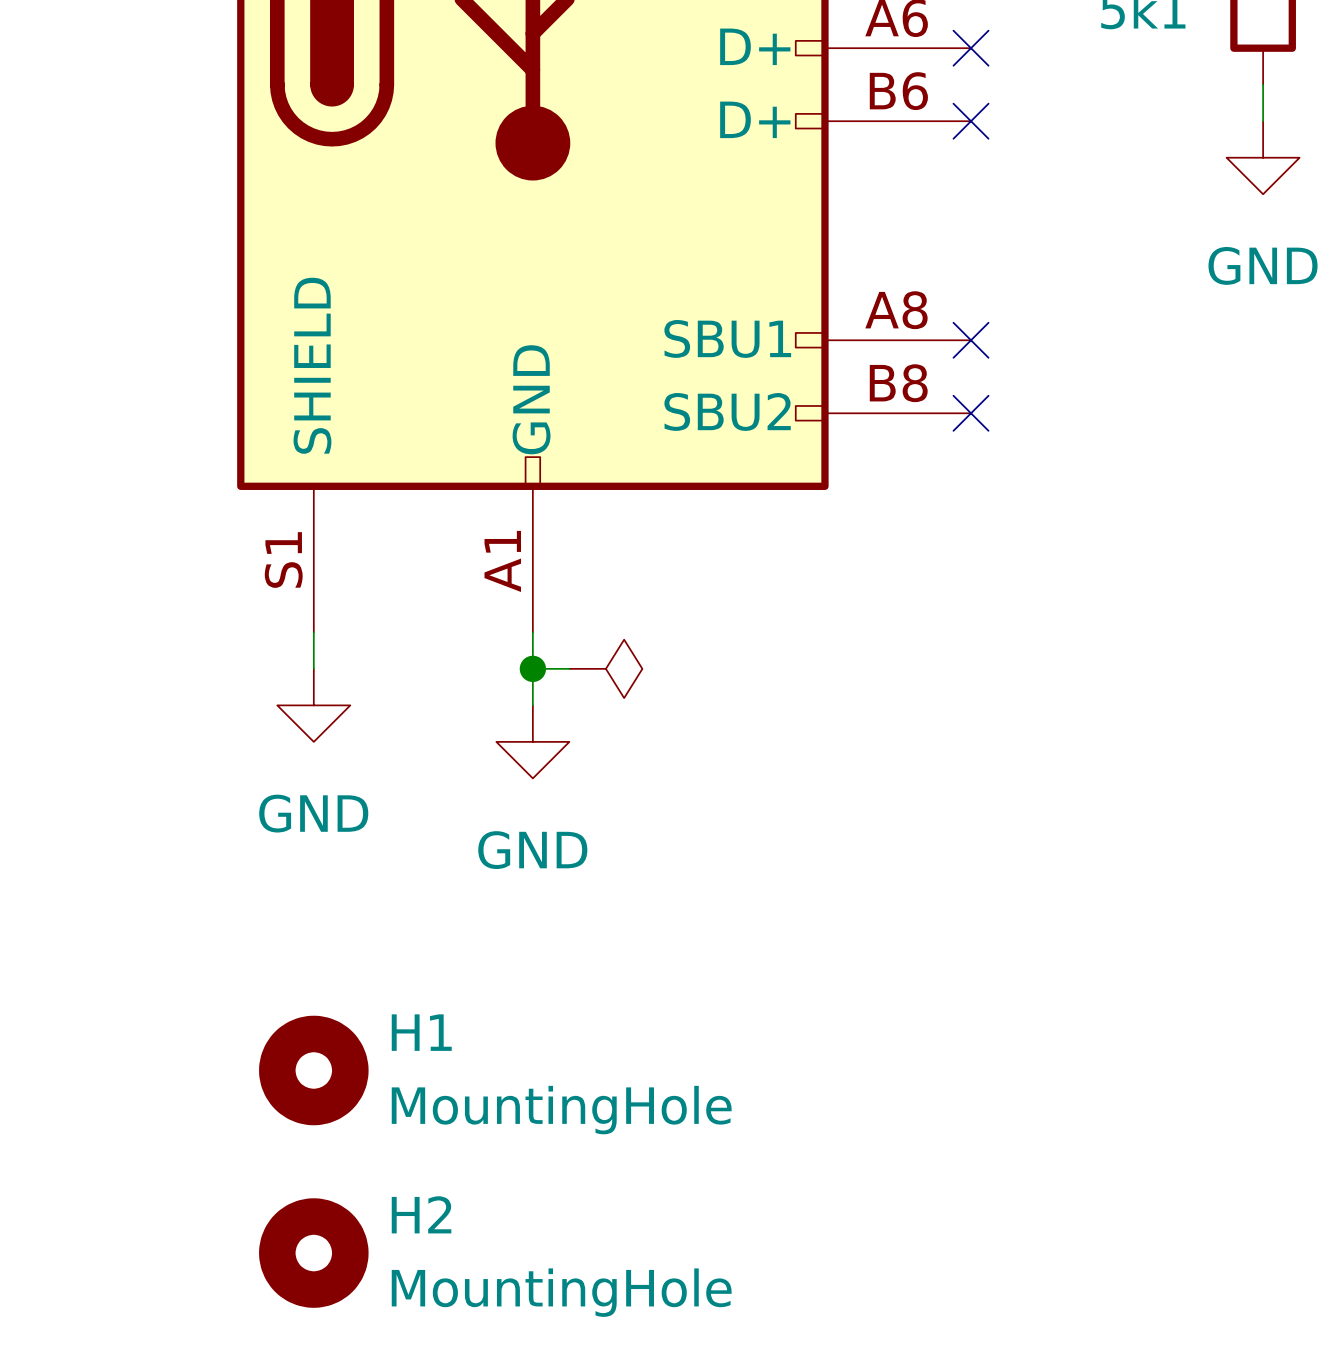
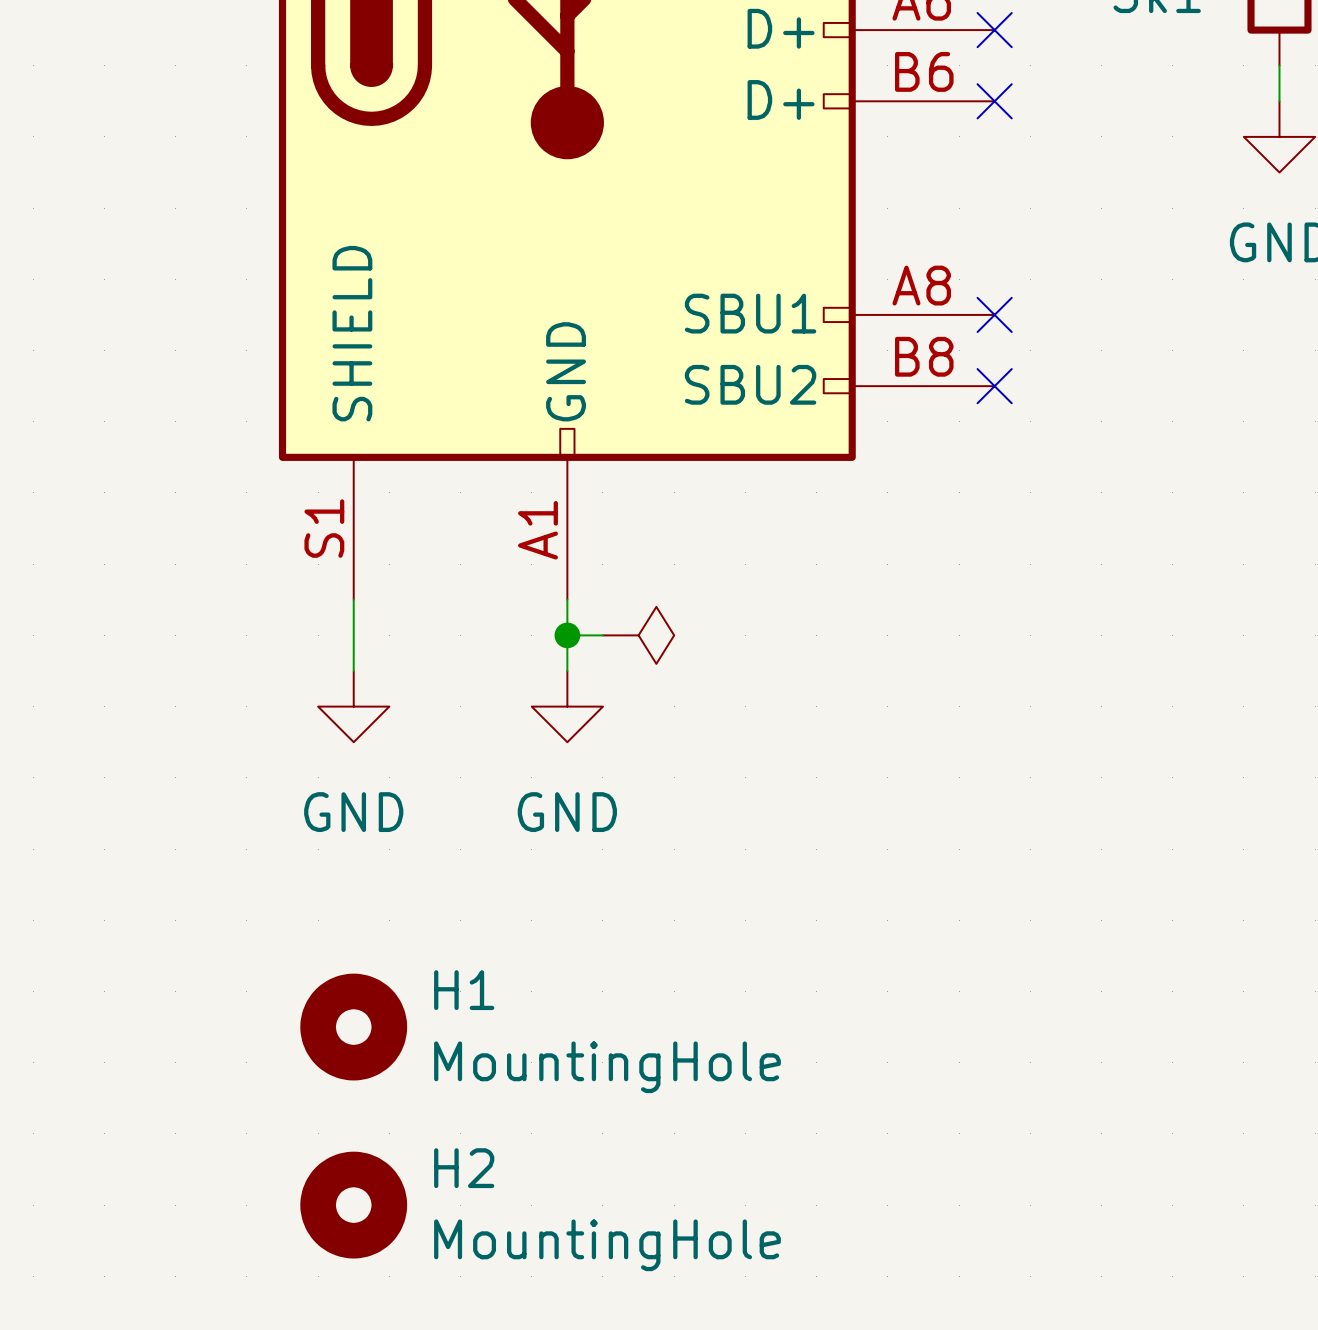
power symbol position: GND (313, 705) -> GND (353, 706)

